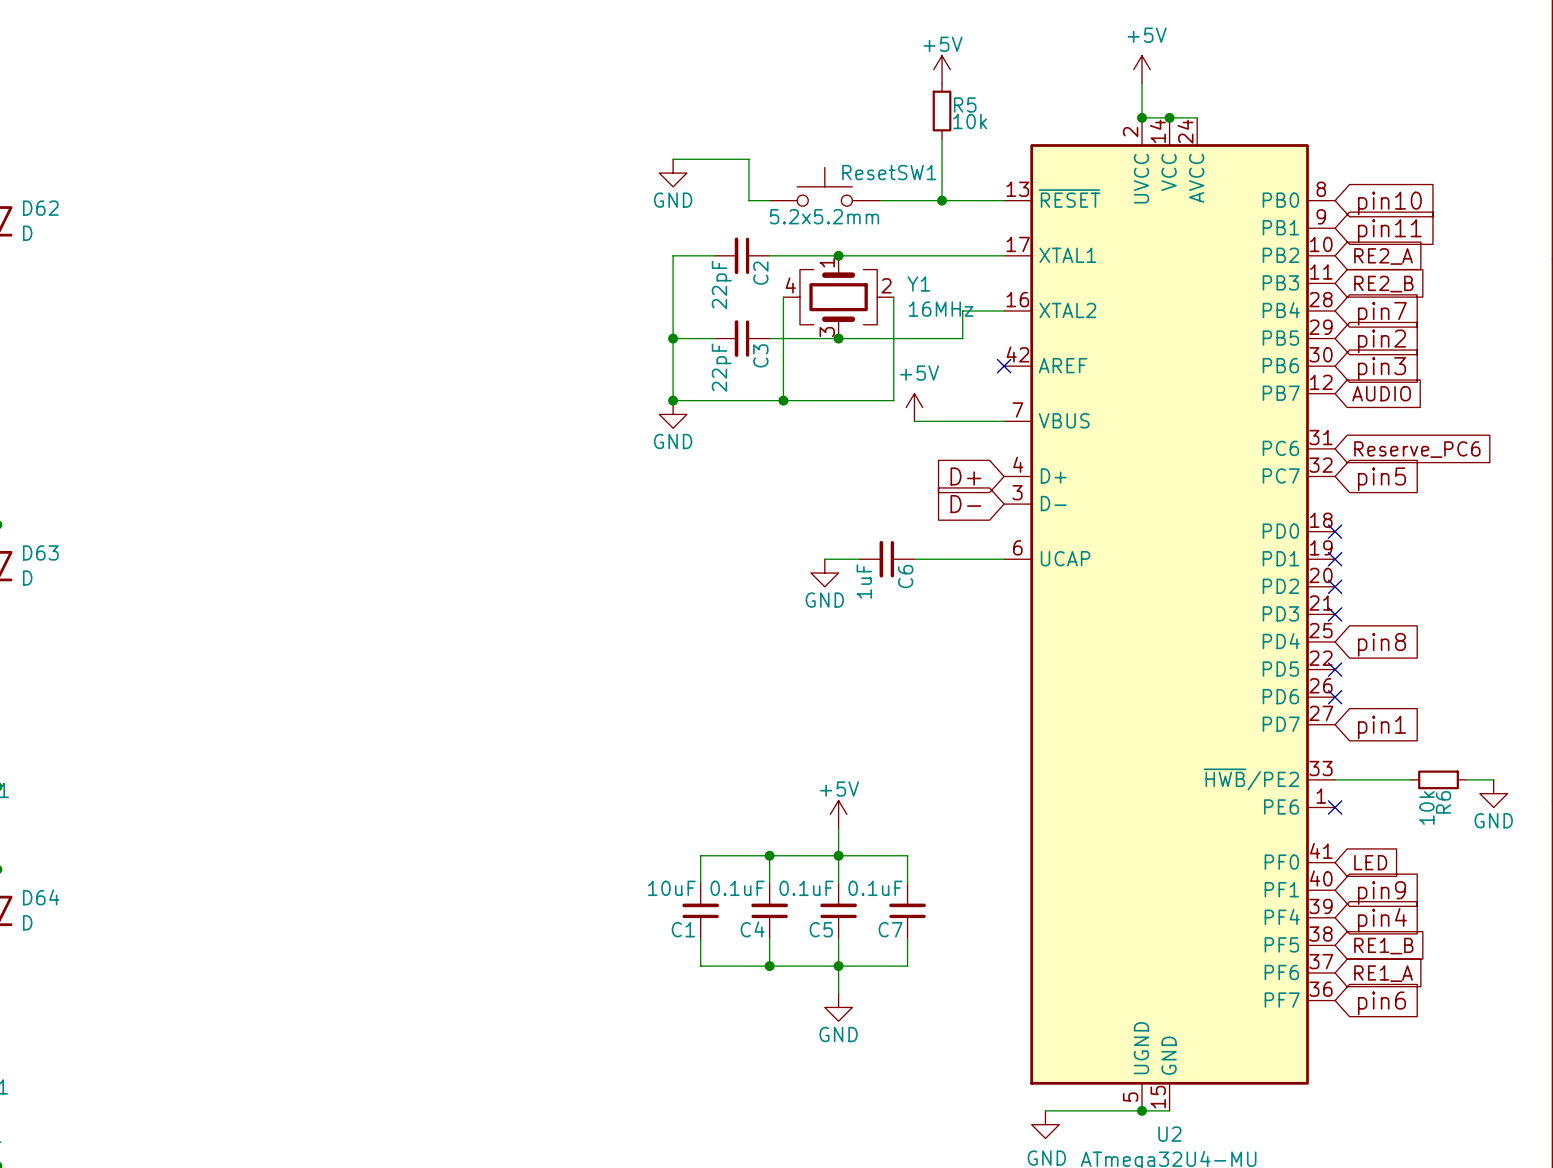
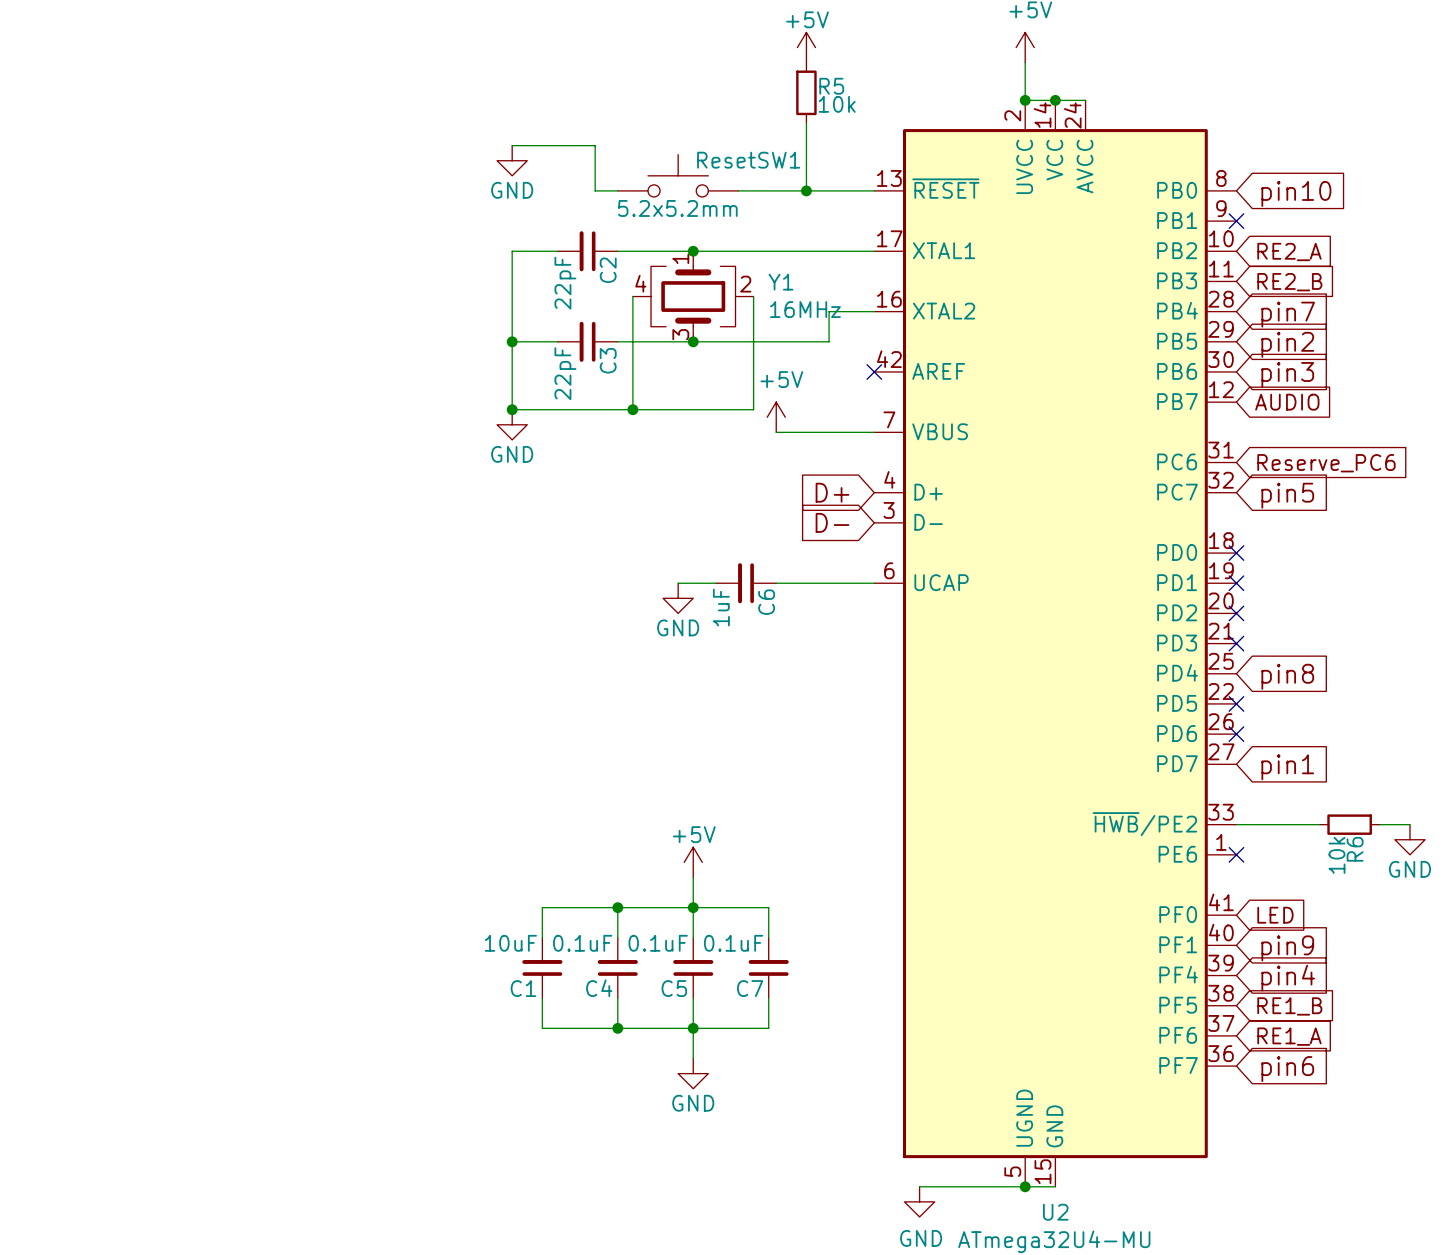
no-connect mark: none -> (1236, 221)
global label: pin11 (1389, 231) -> none

